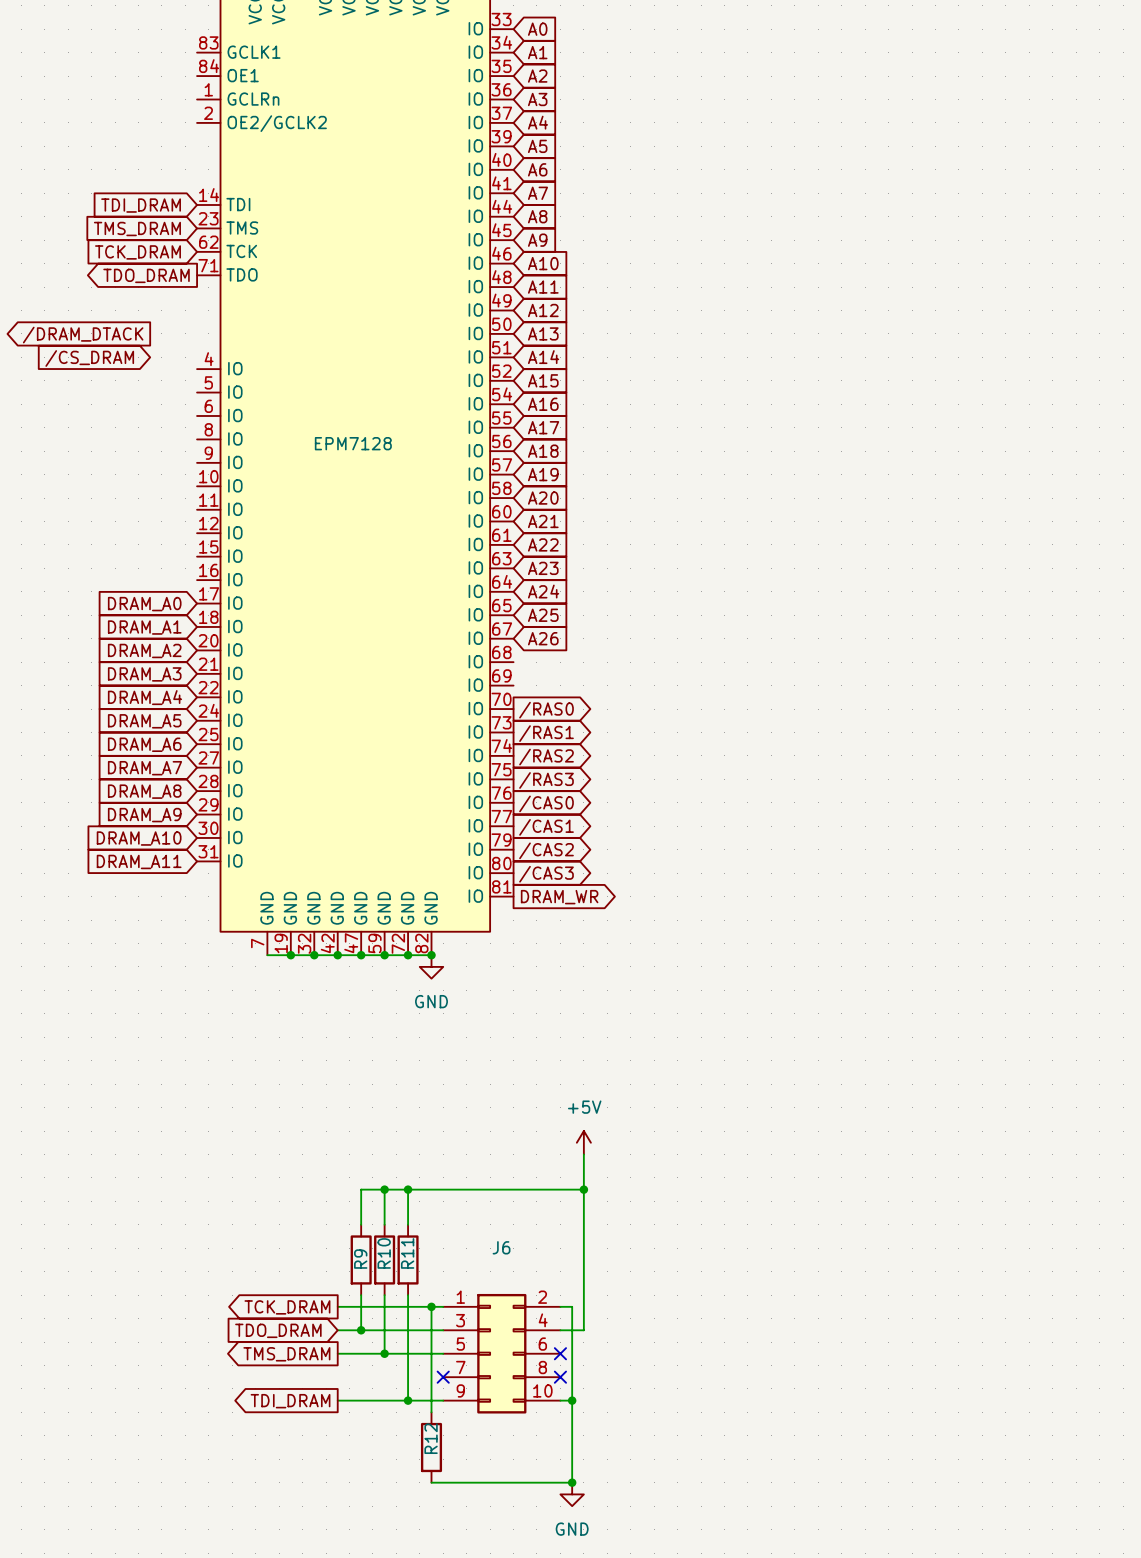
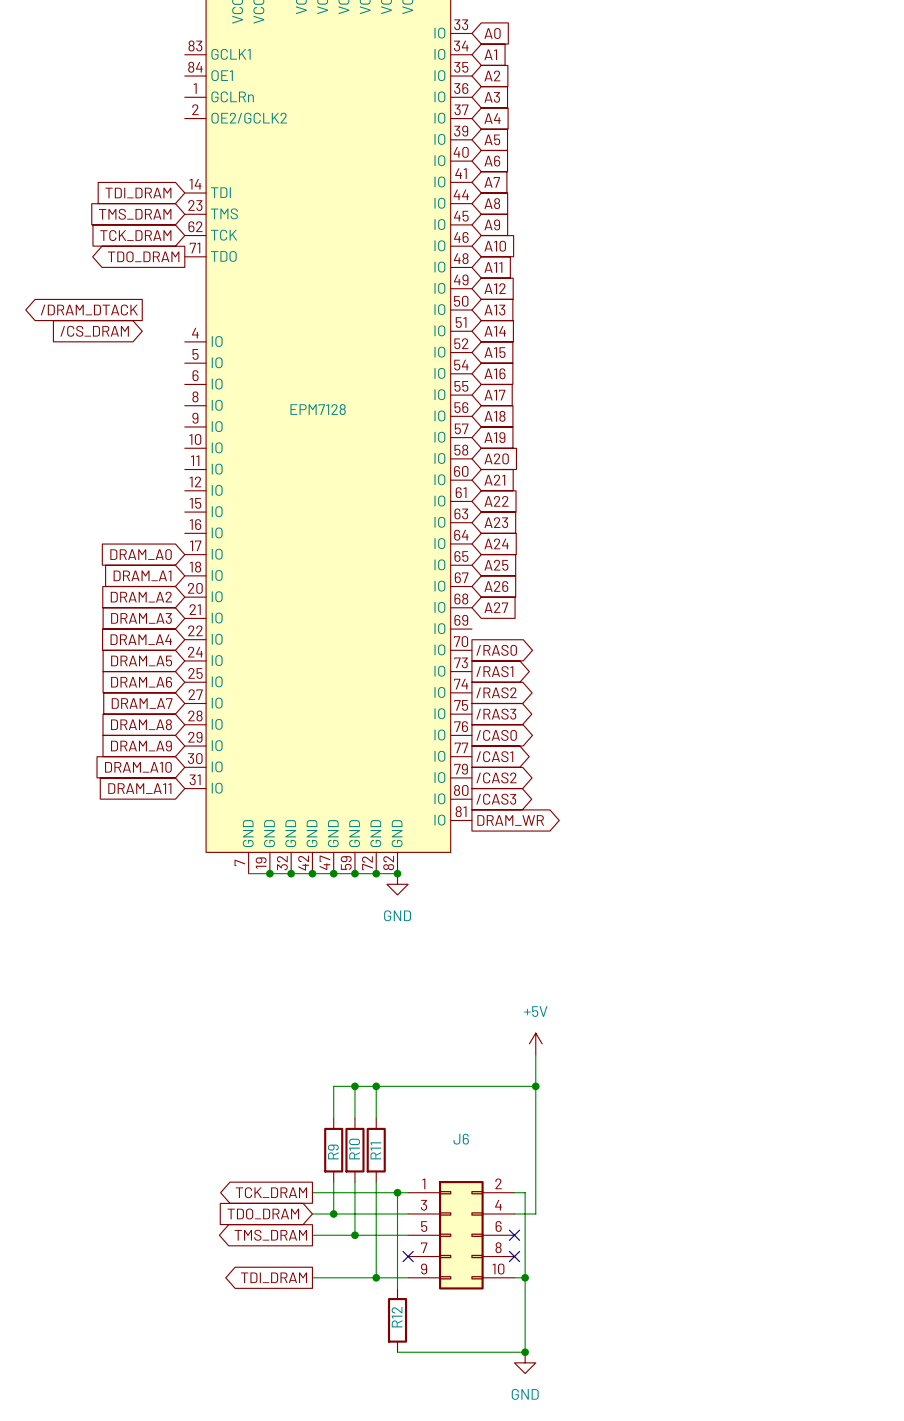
global label: none -> A27 (496, 607)

